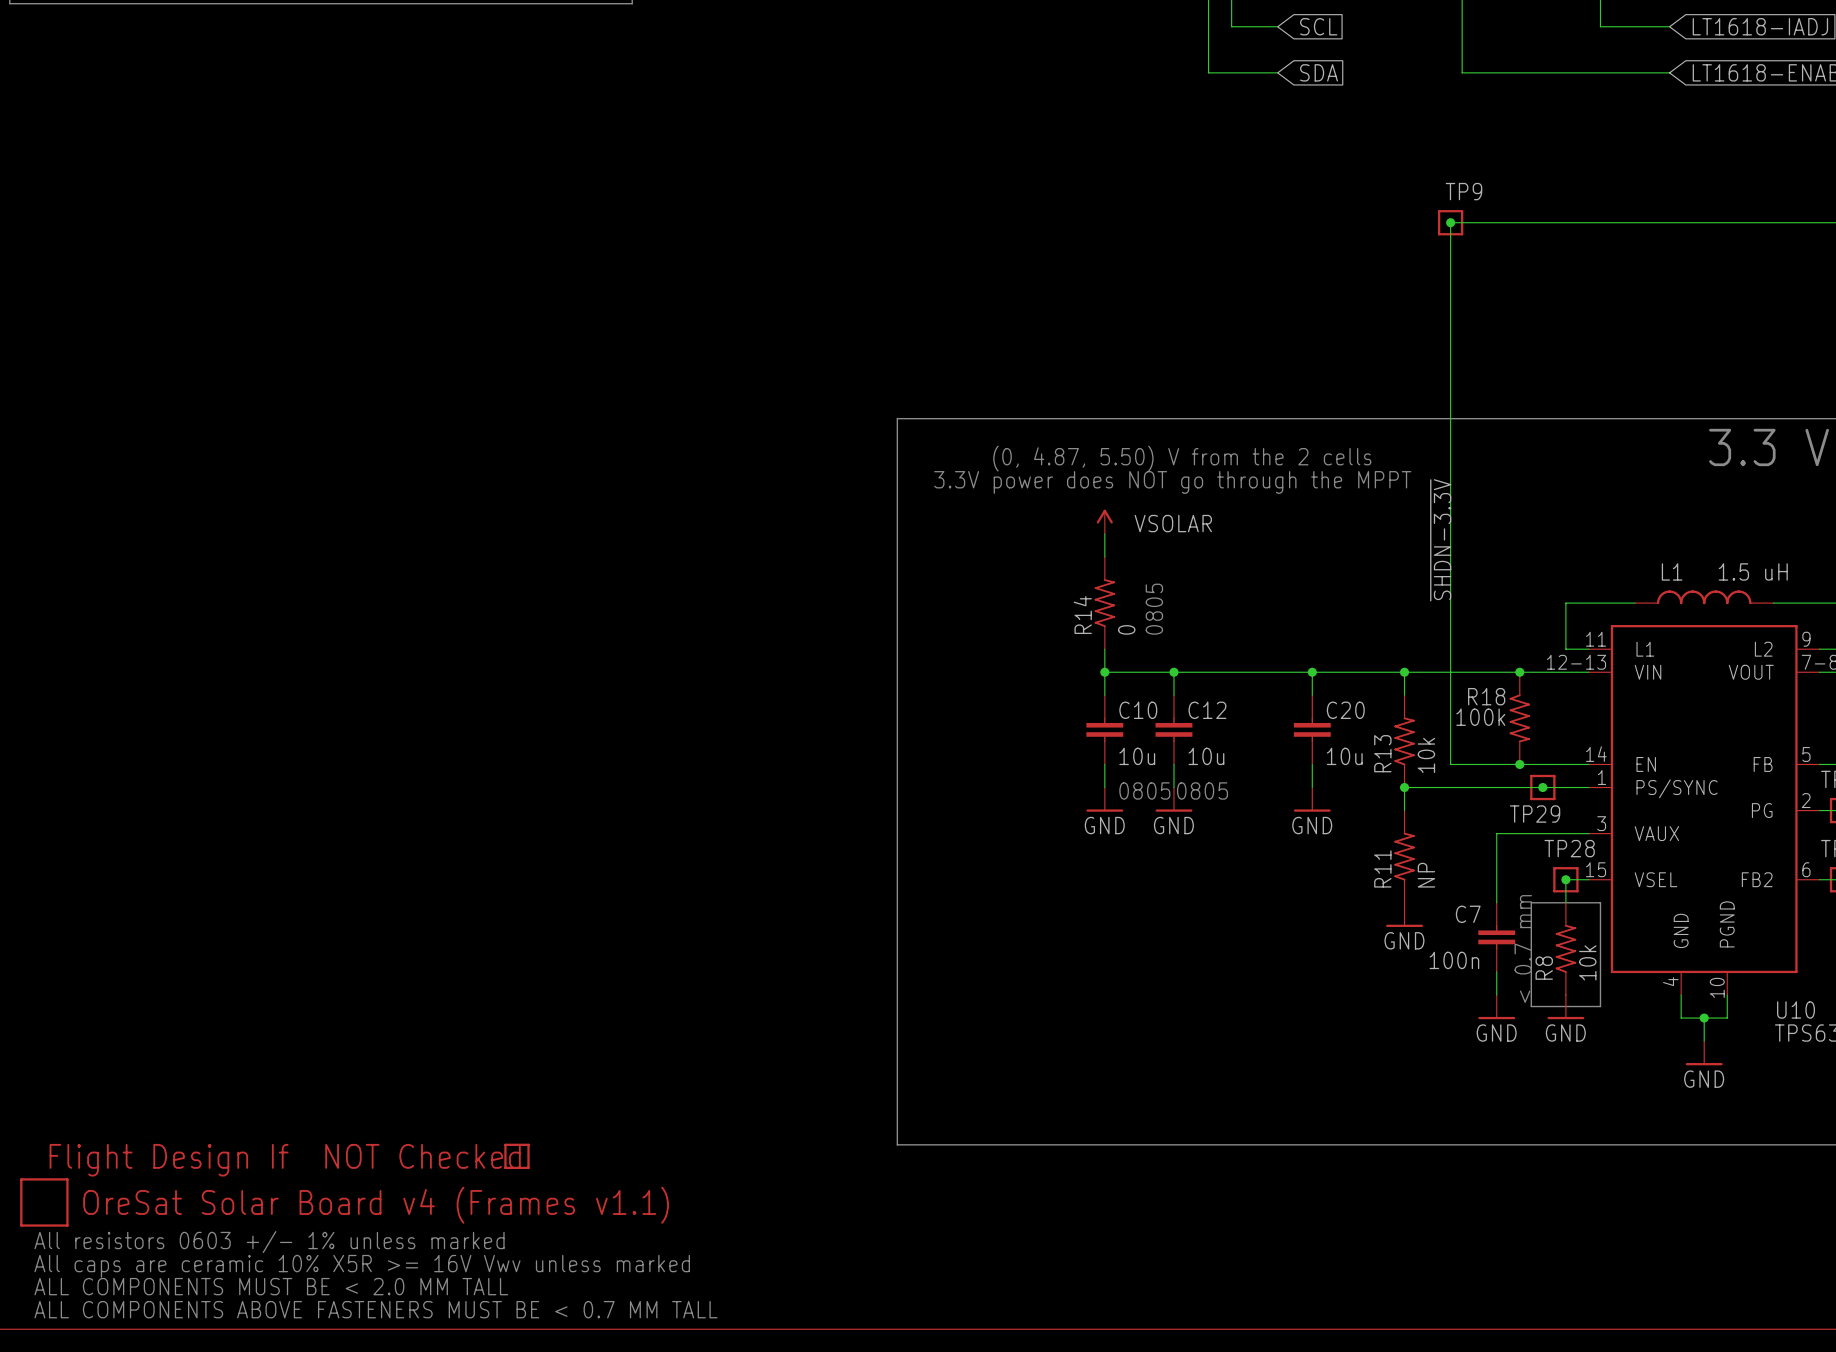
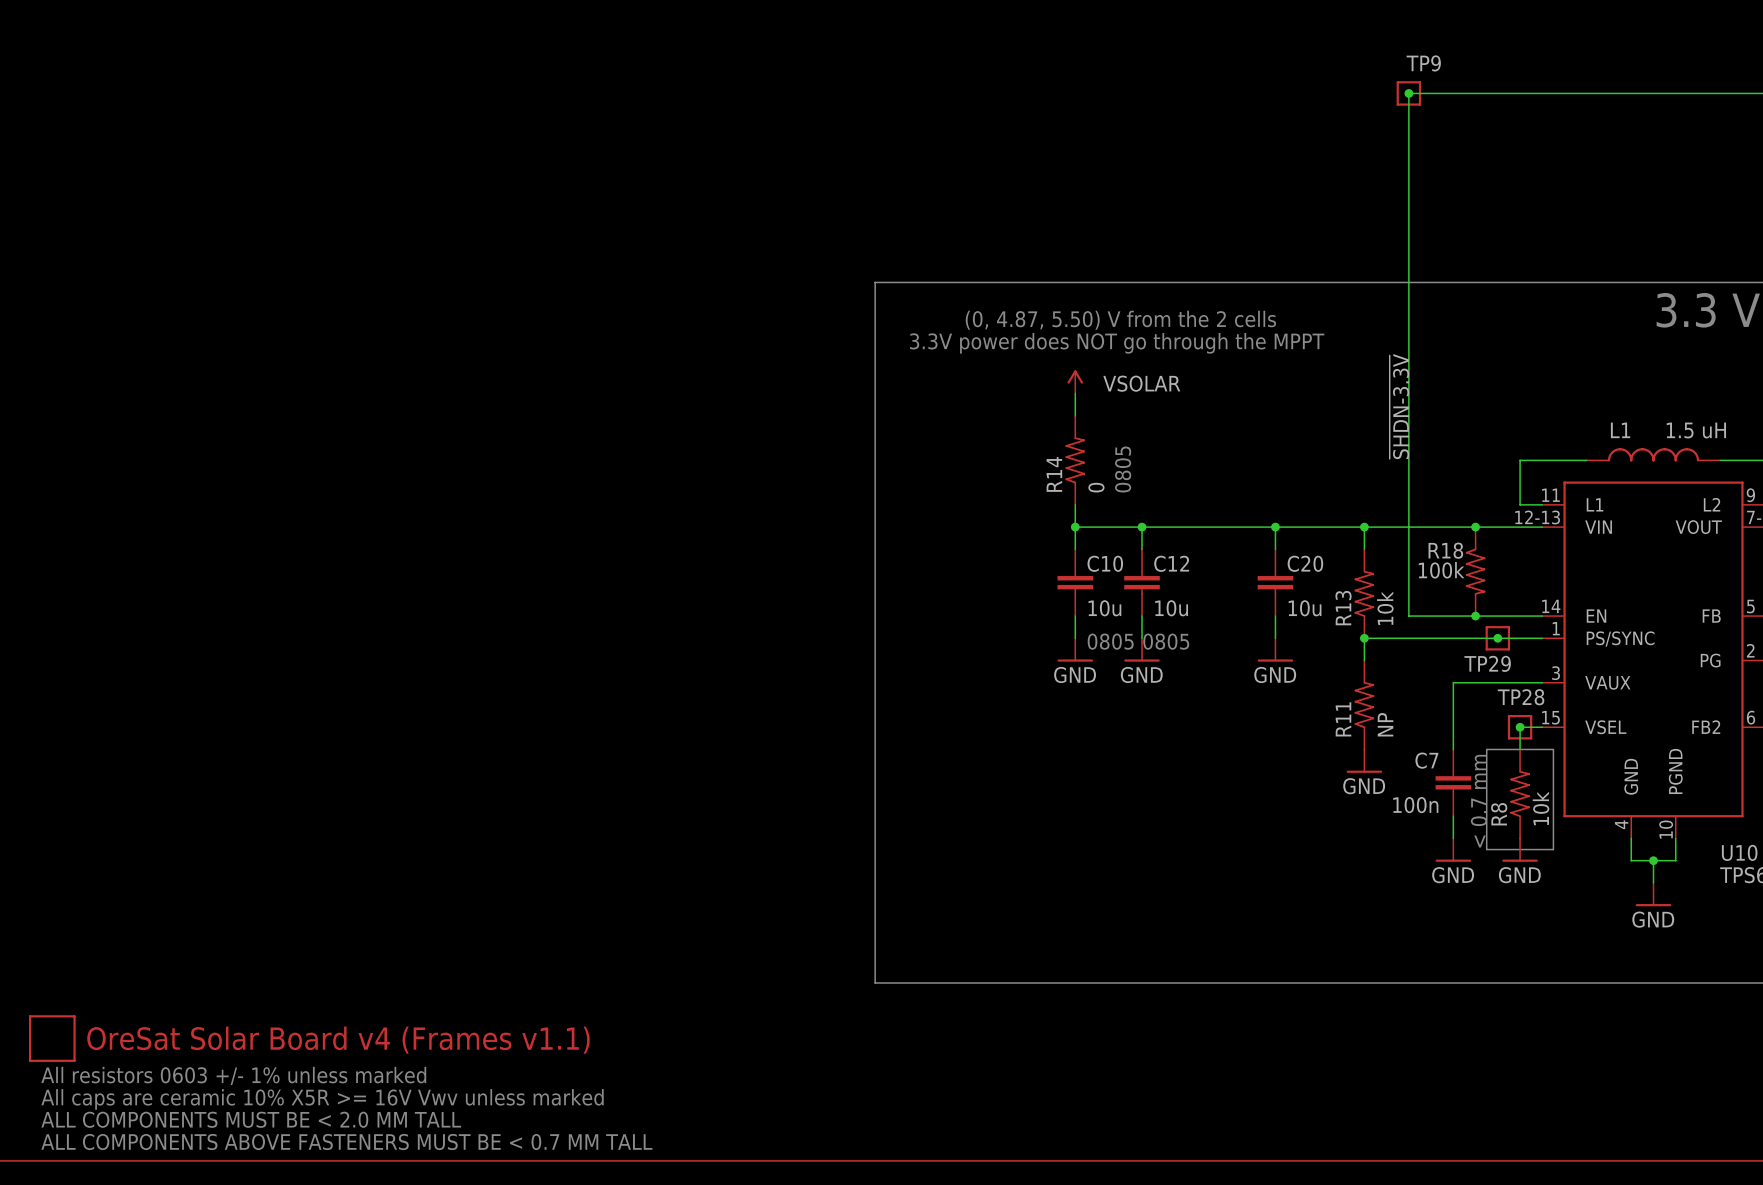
part: (516, 1156) -> none

